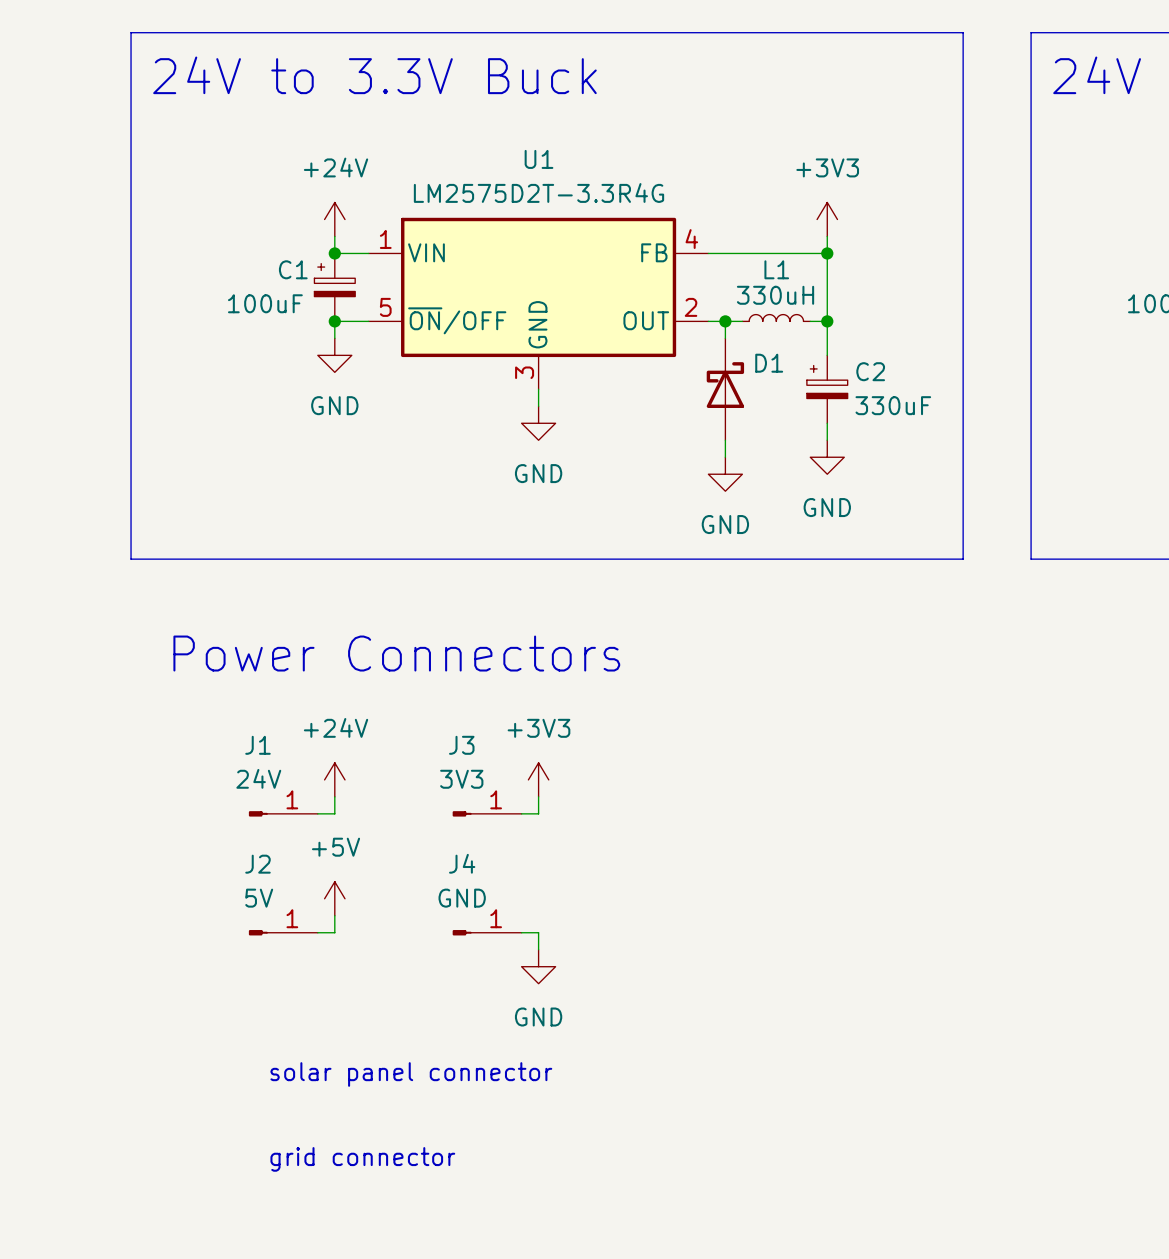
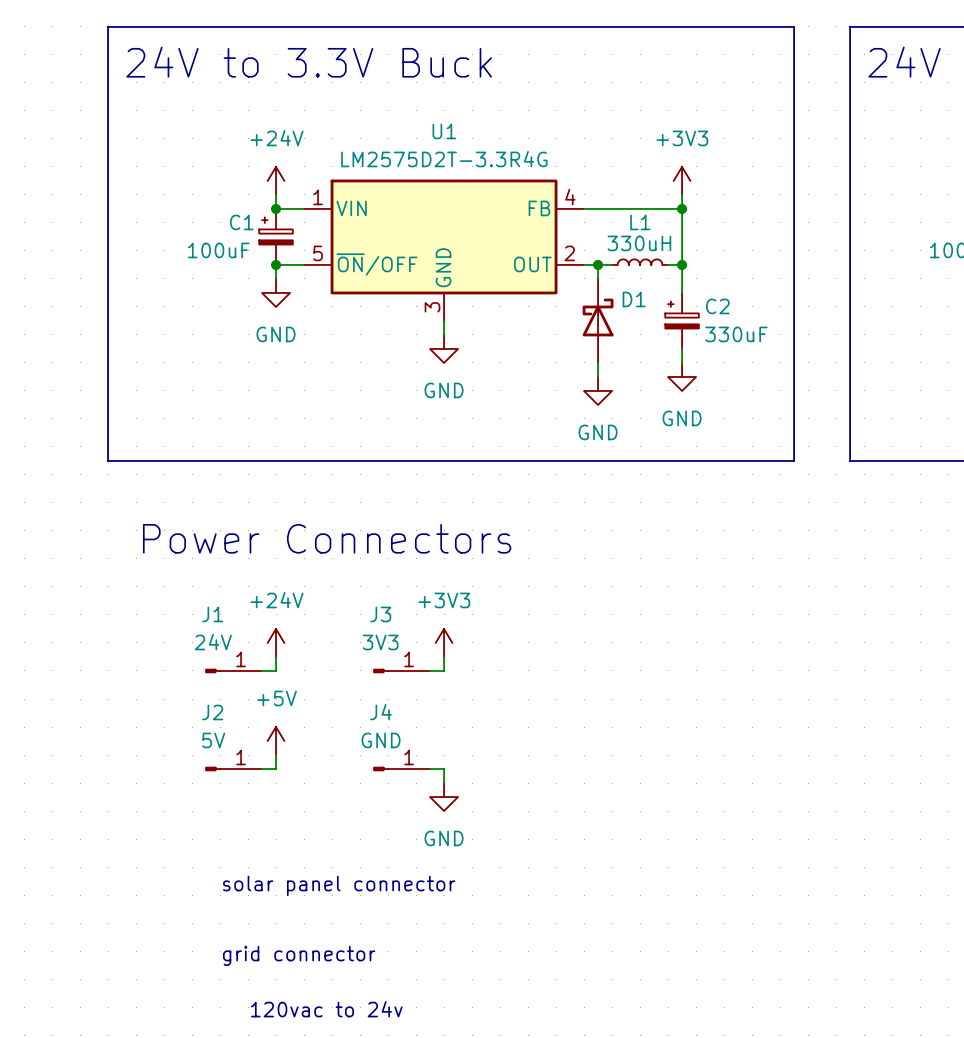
text: none -> 120vac to 24v (326, 1009)

